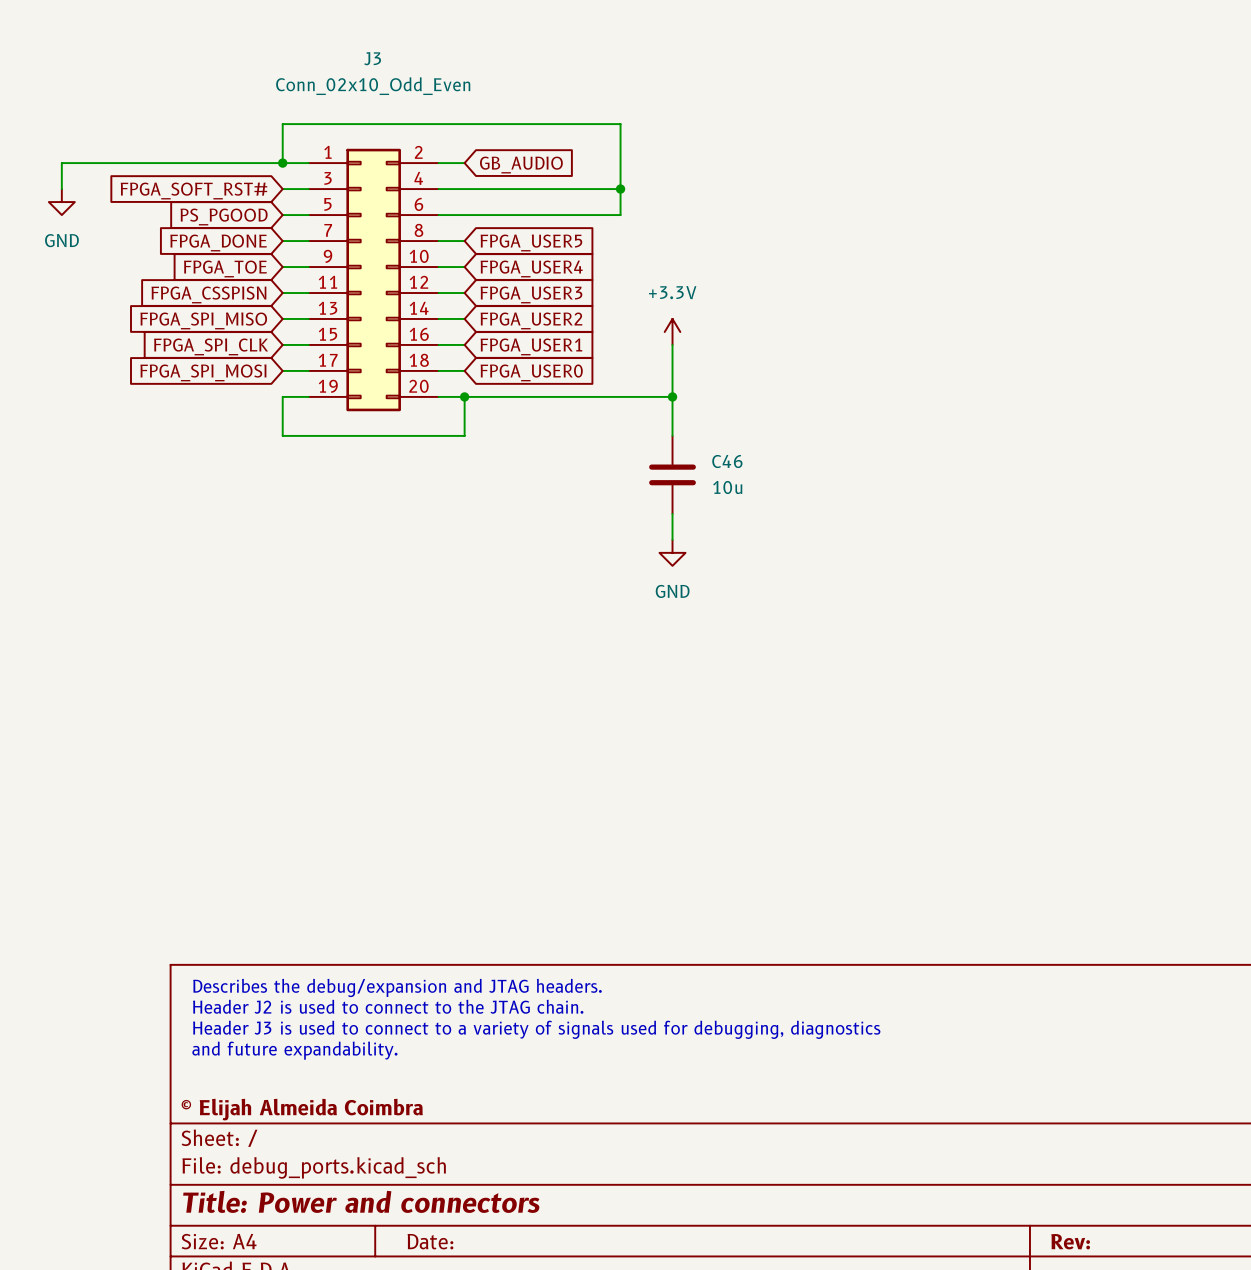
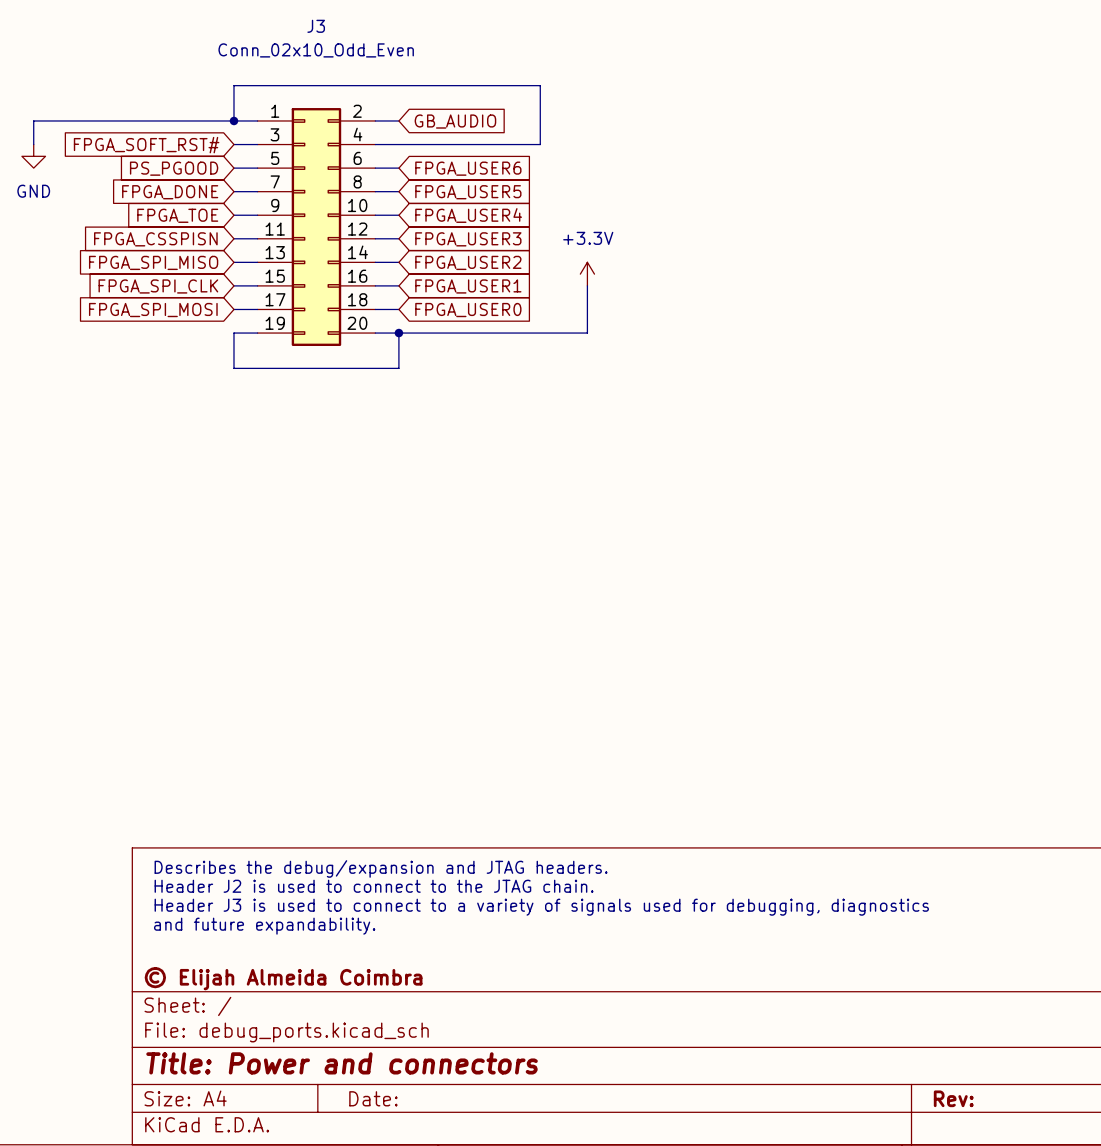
wire: (620, 189) (620, 215) (464, 215) -> none
junction: (620, 189) -> none
global label: none -> FPGA_USER6 (468, 168)
wire: (672, 396) (672, 435) -> none
junction: (672, 396) -> none
C46: 10u (672, 474) -> none
wire: (672, 513) (672, 539) -> none
power symbol: GND (672, 552) -> none

